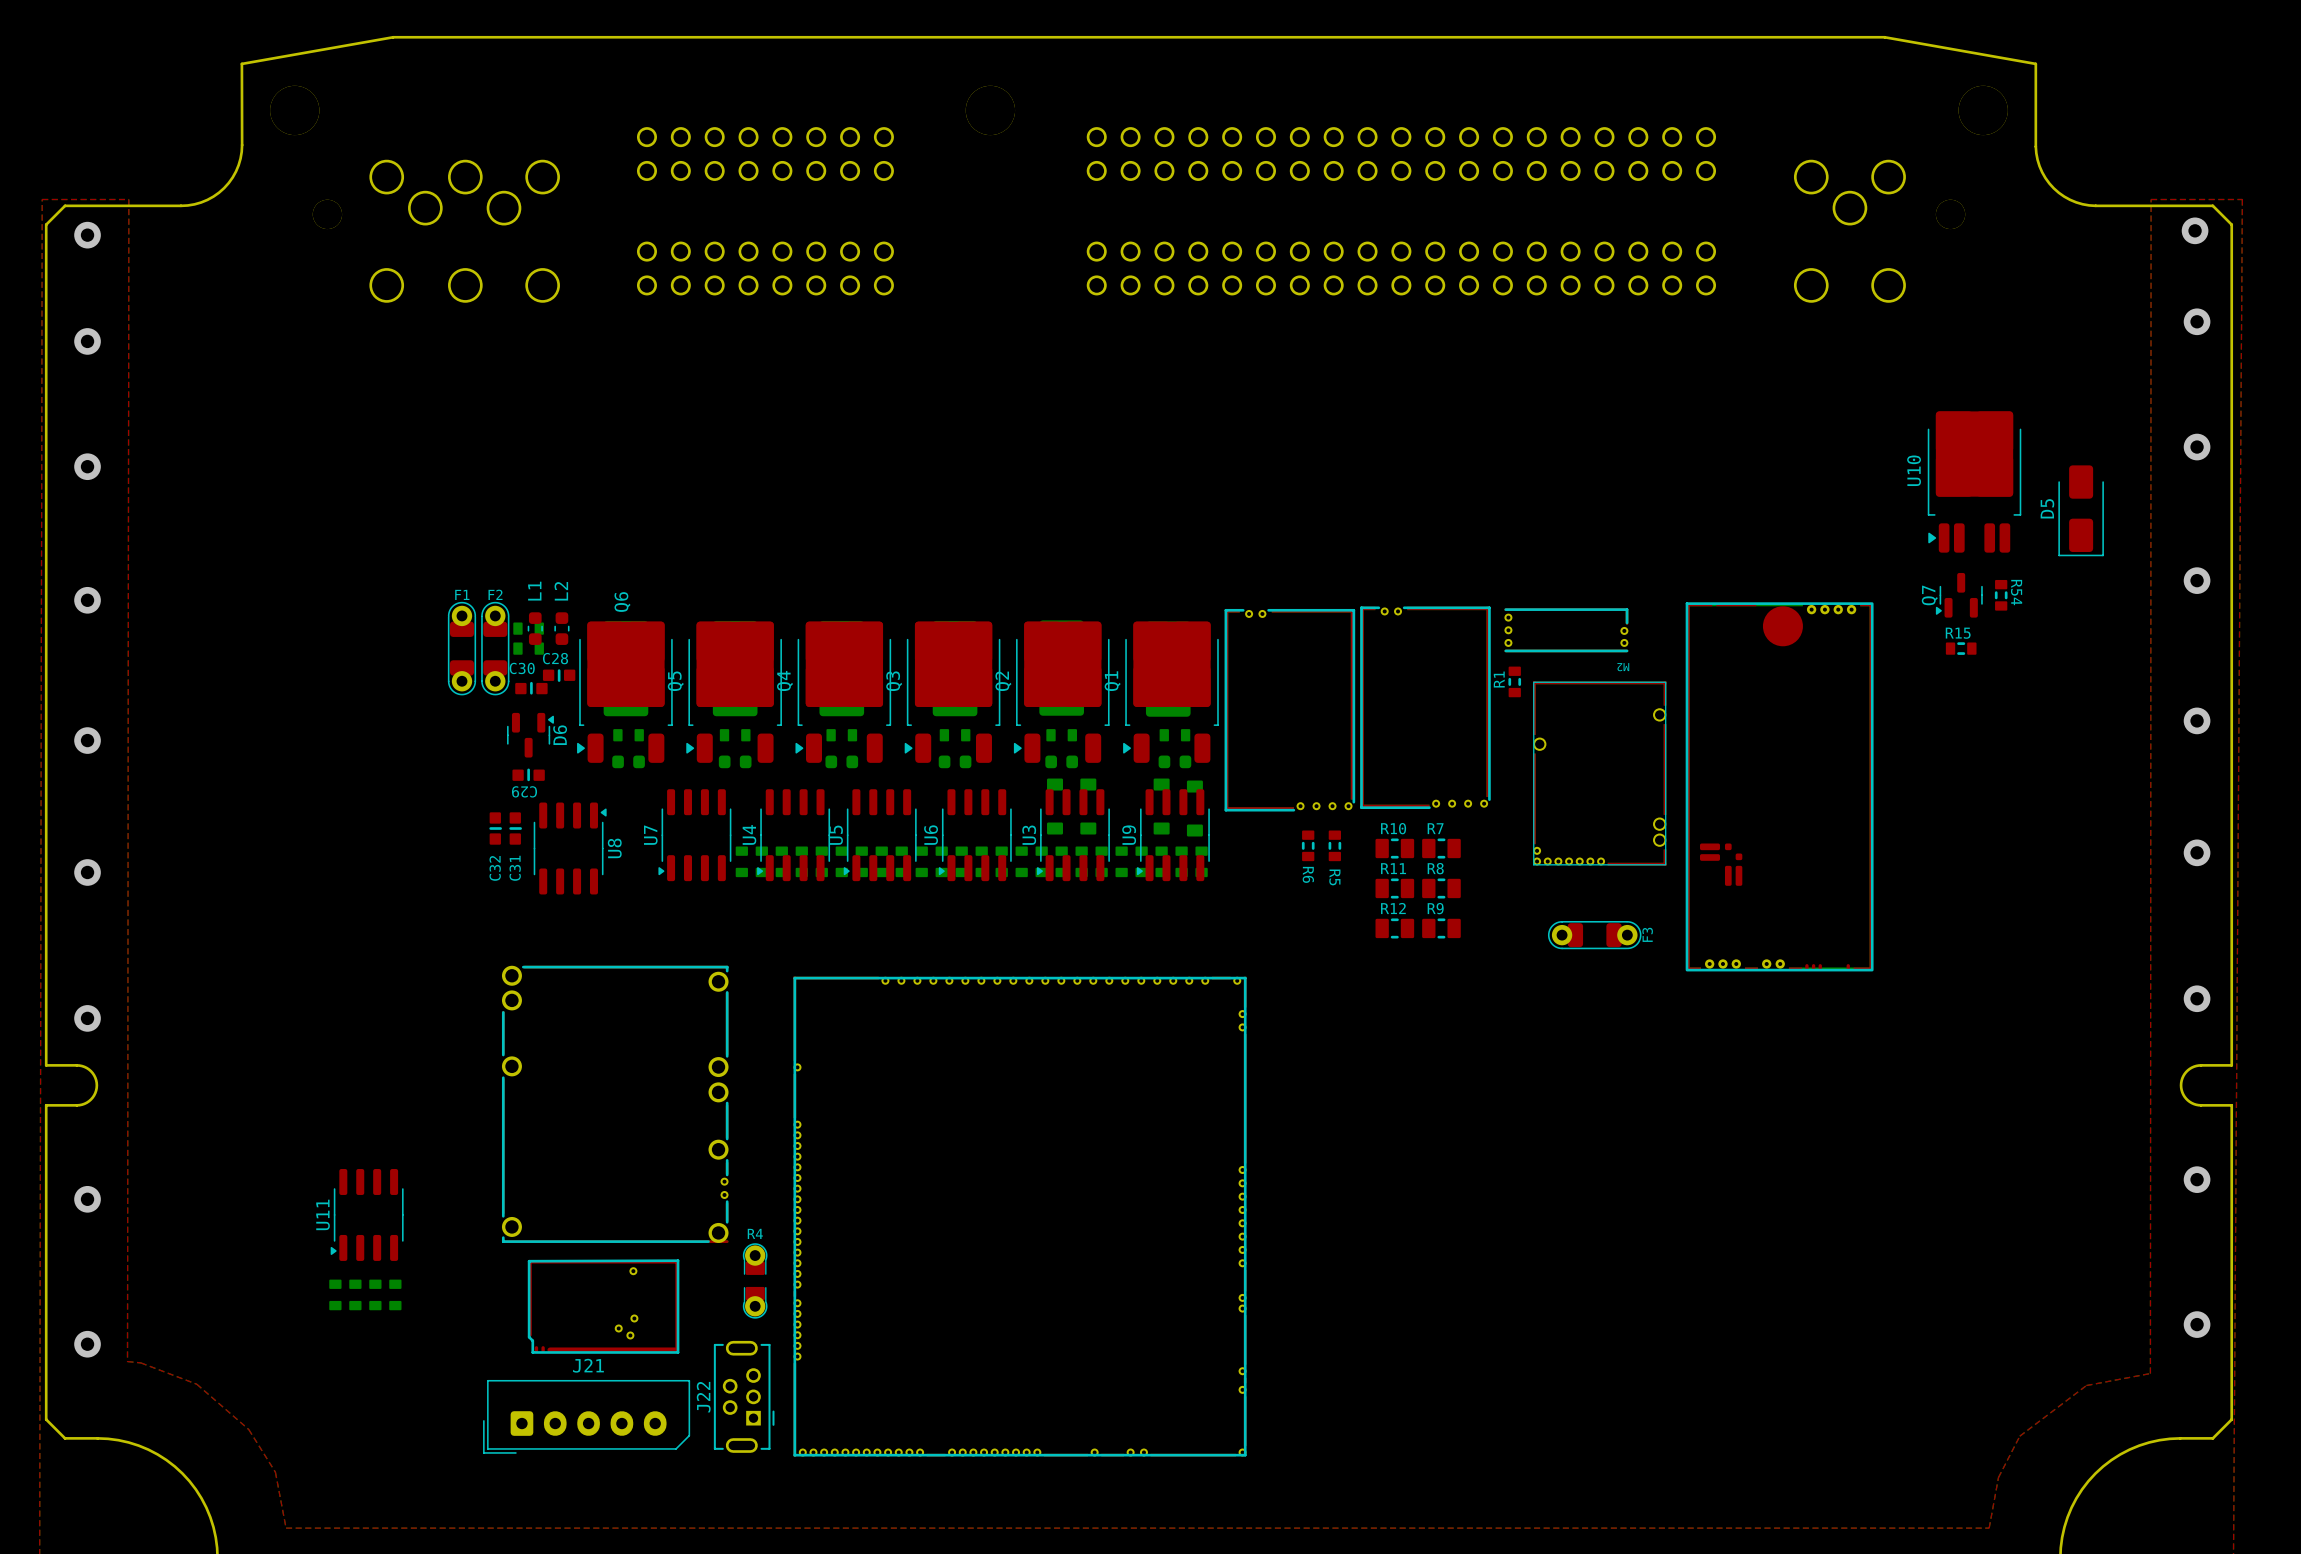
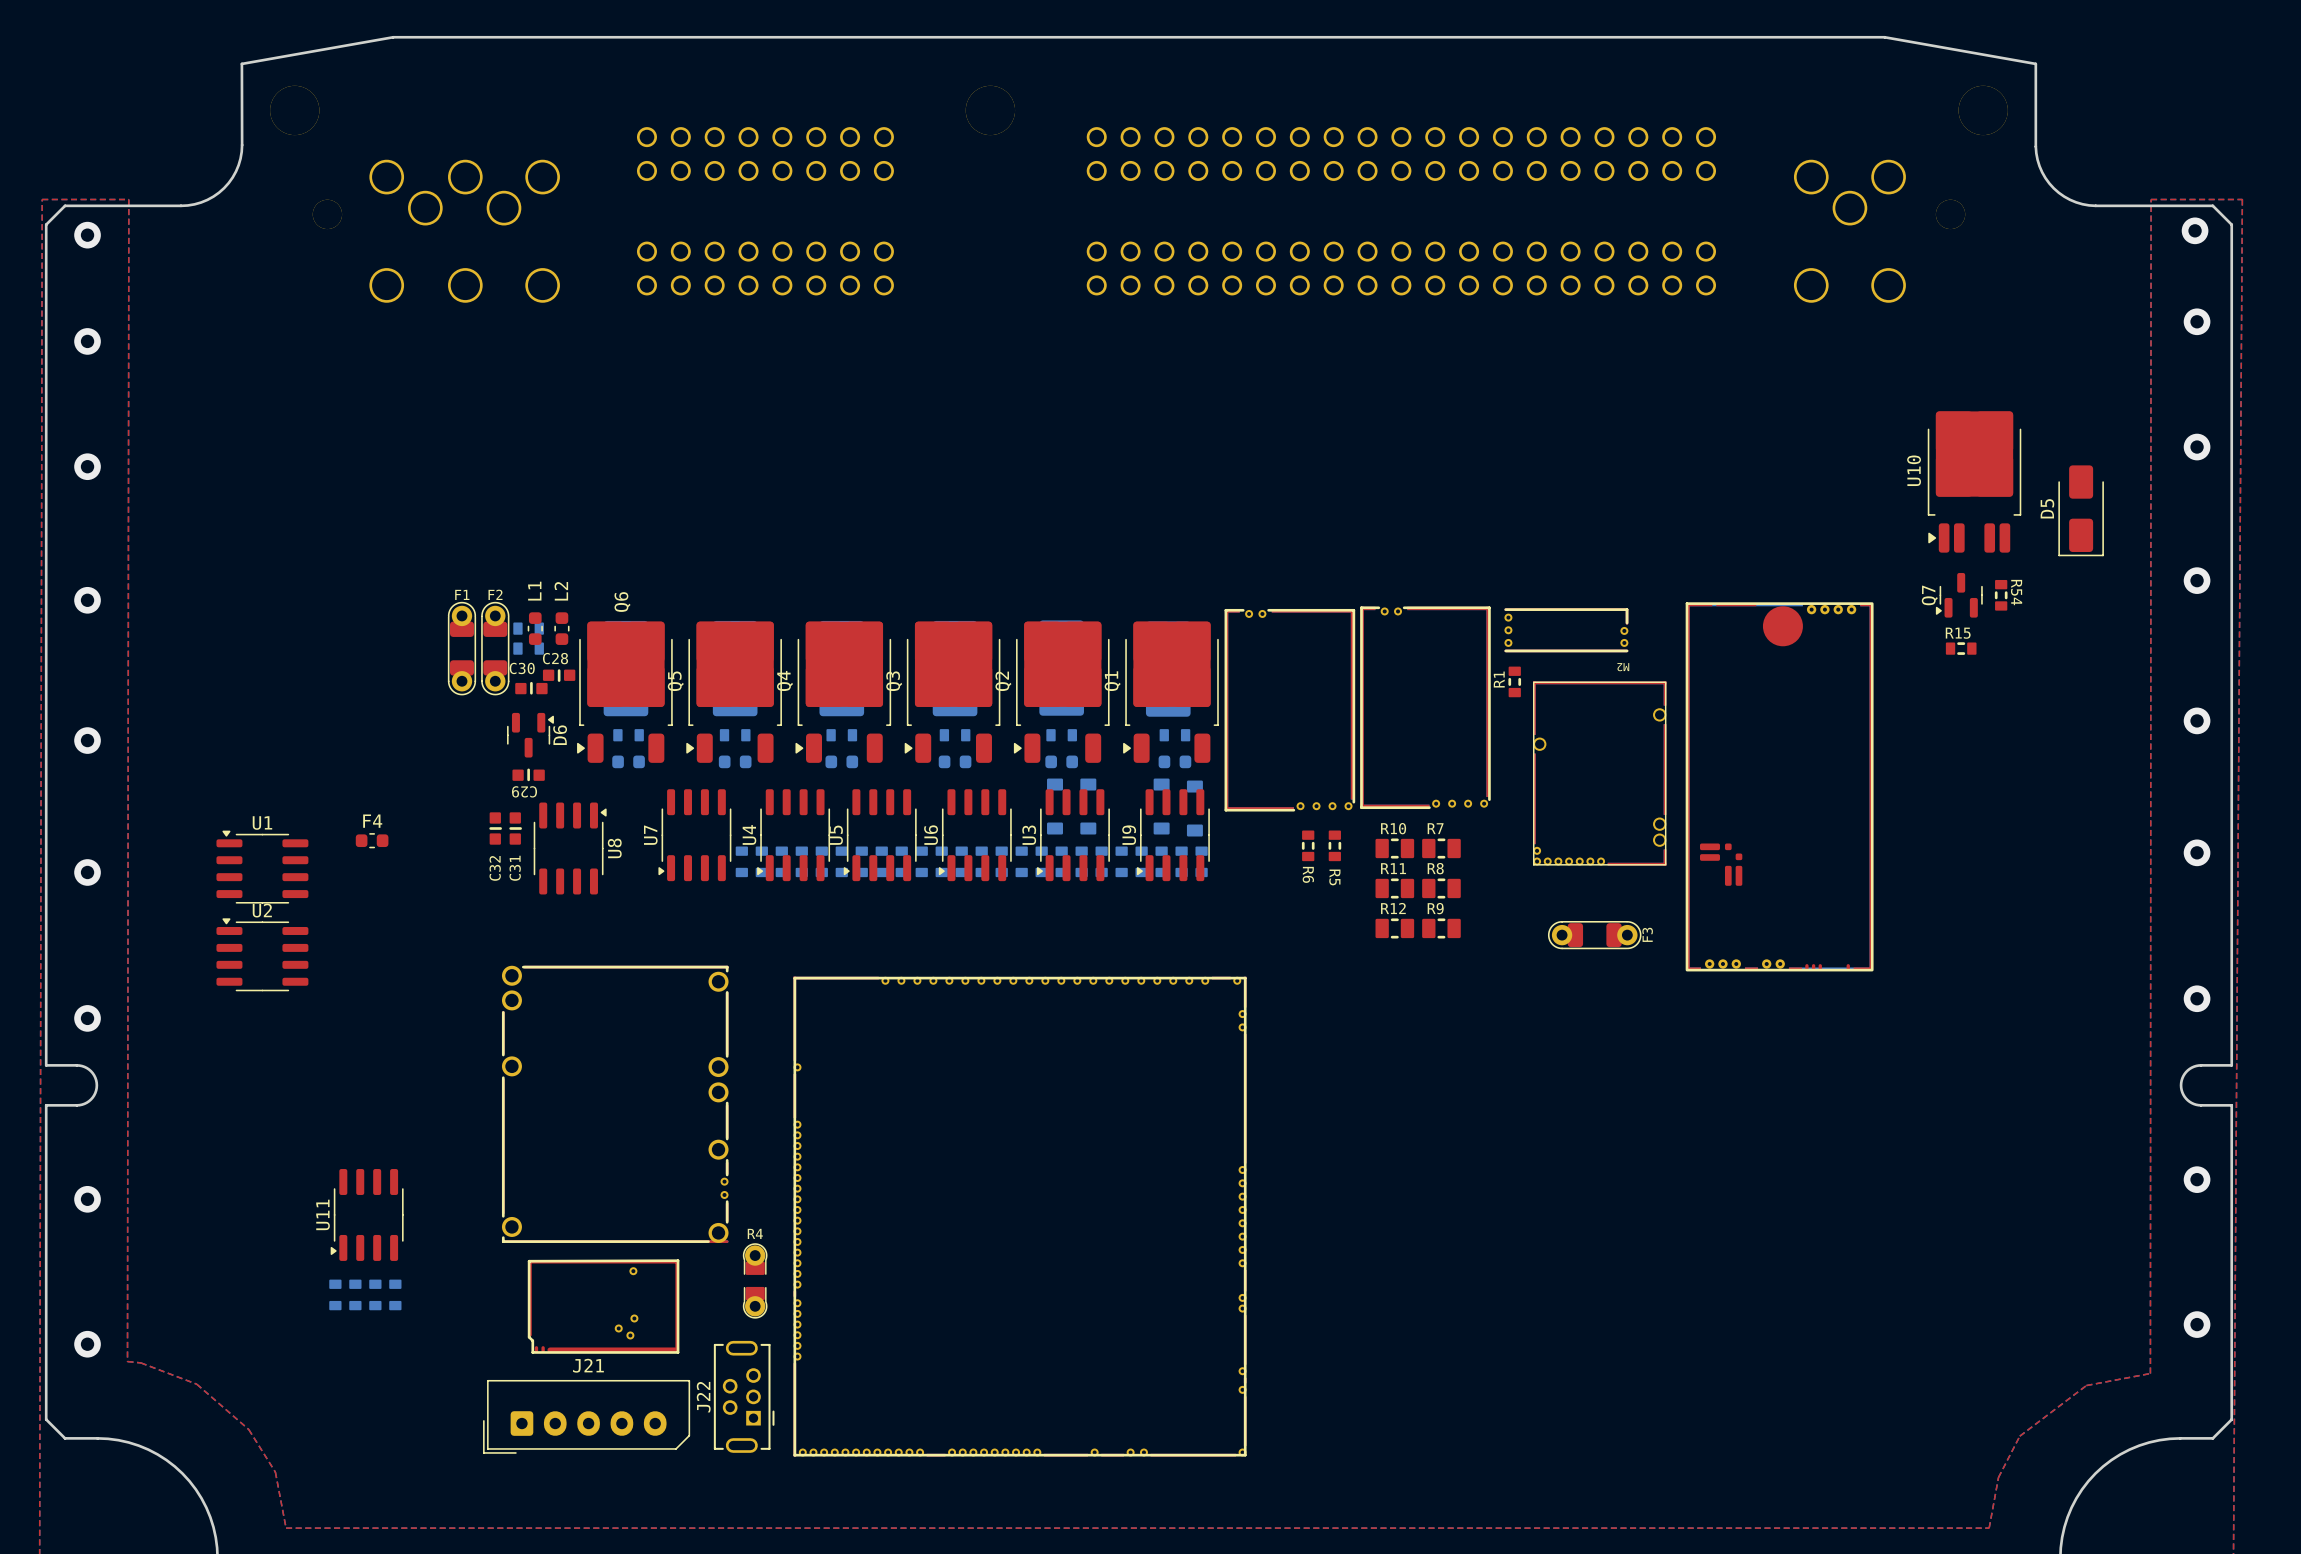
F4: none -> (372, 840)
U1: none -> (262, 867)
U2: none -> (262, 954)

